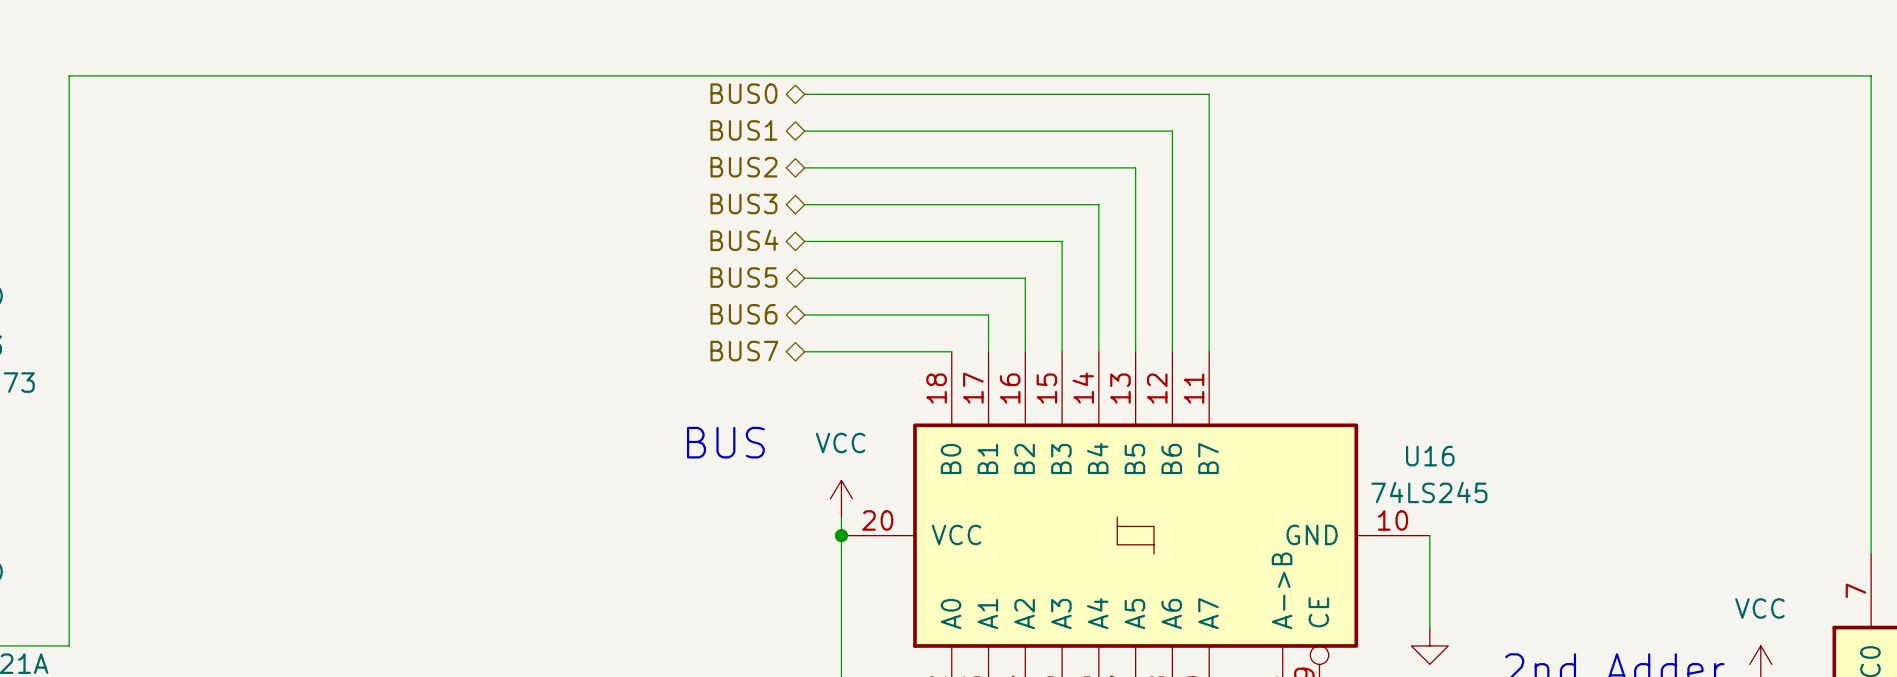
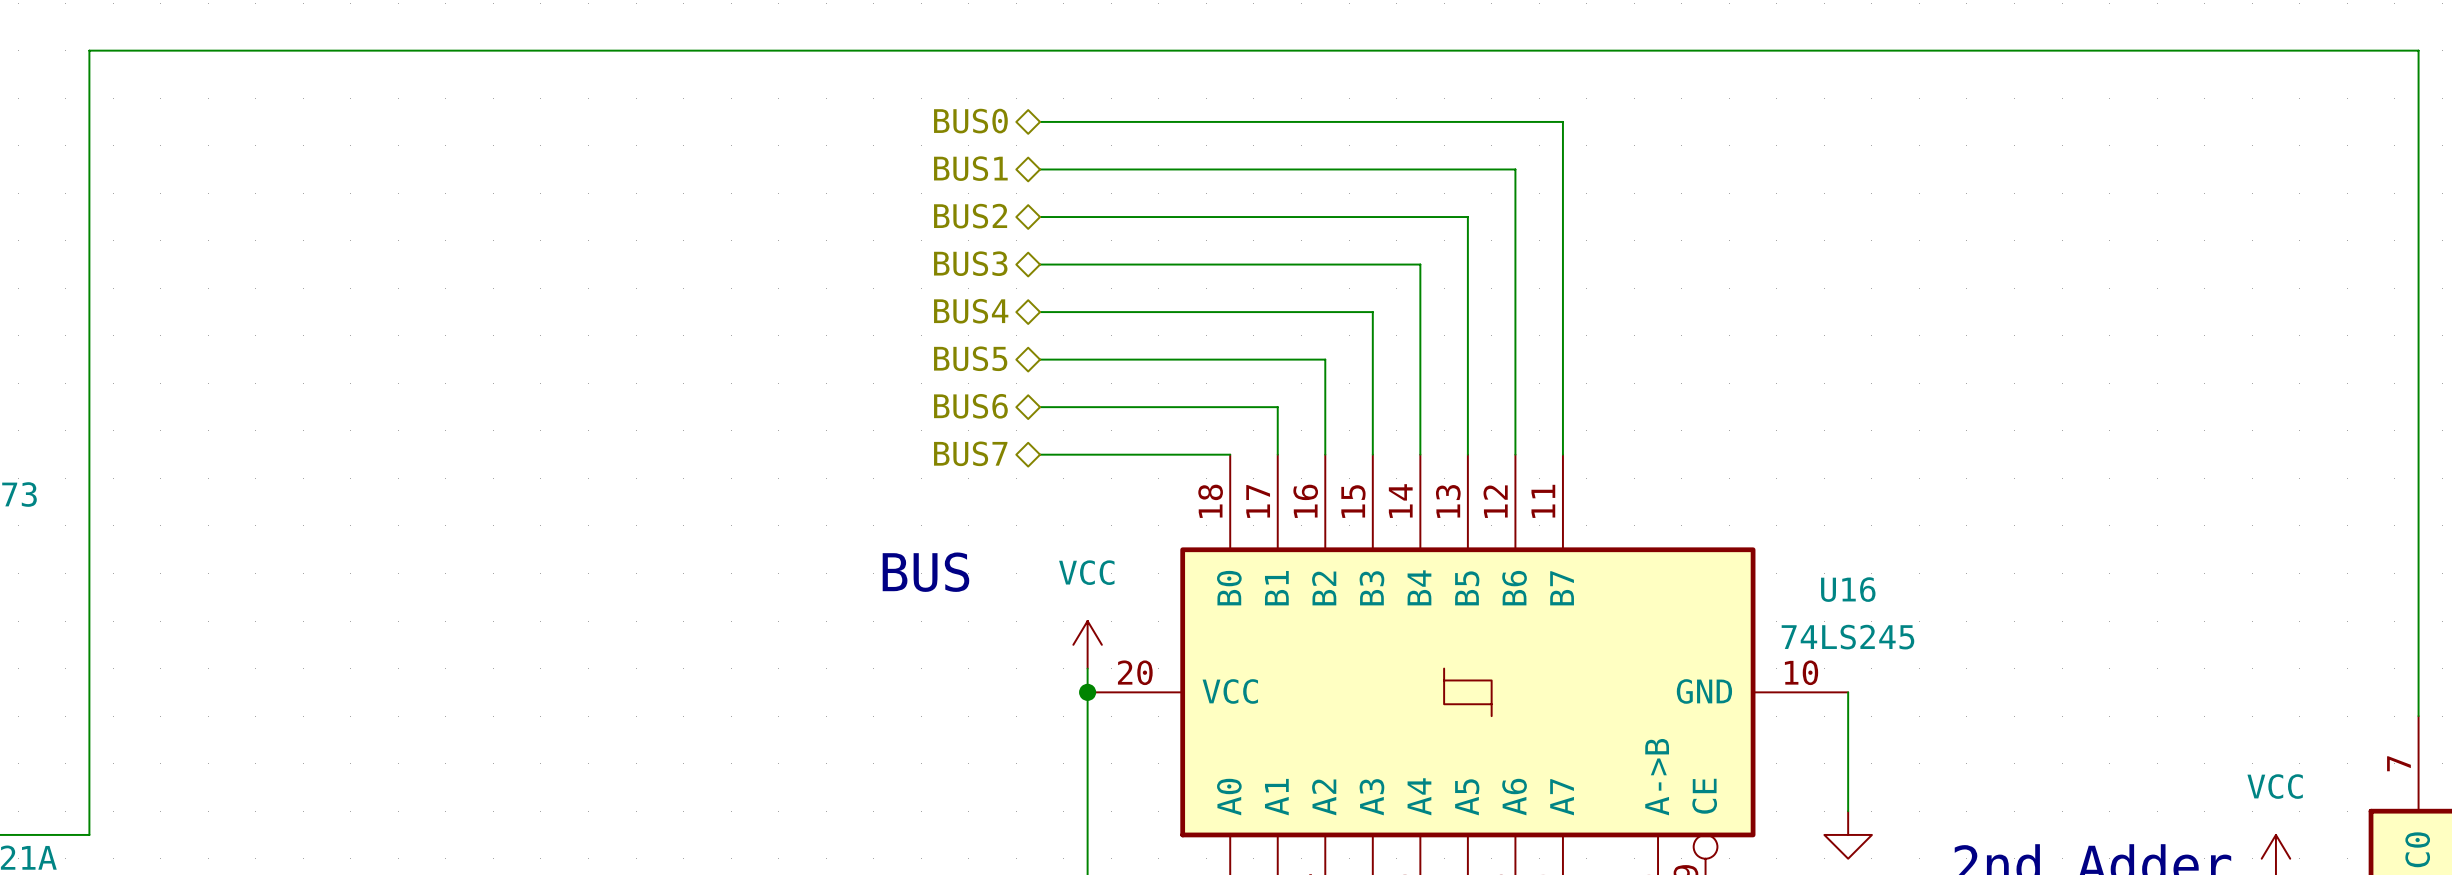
wire: (69, 75) (1871, 75) -> (89, 98) (89, 50) (2418, 50) (2418, 98)

